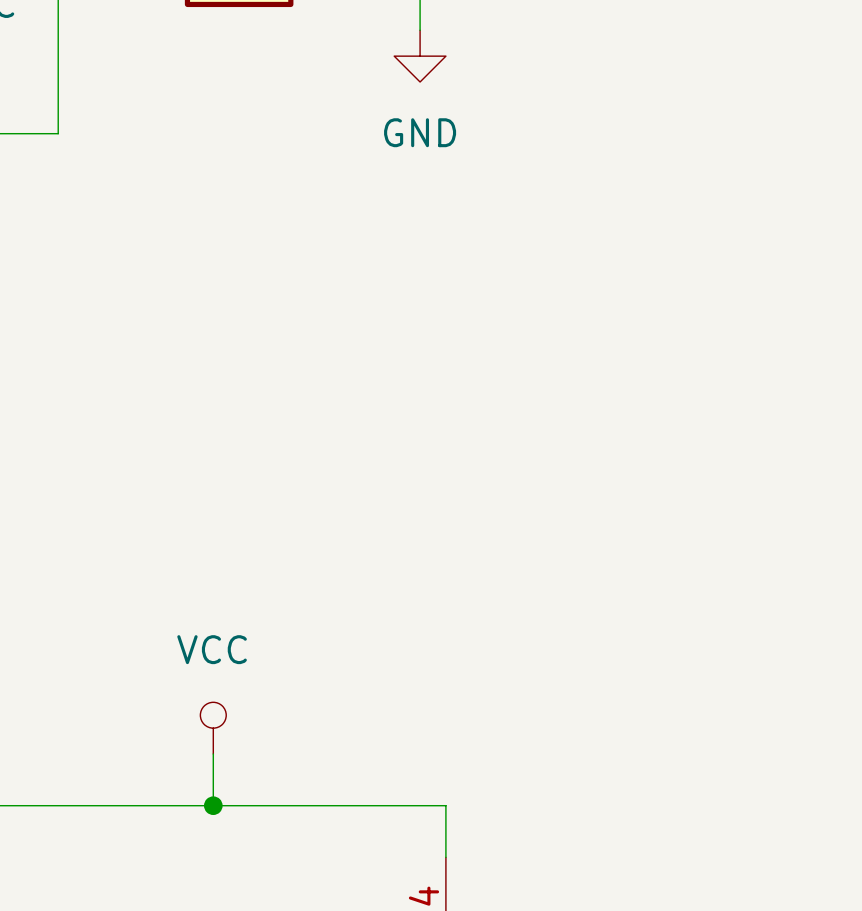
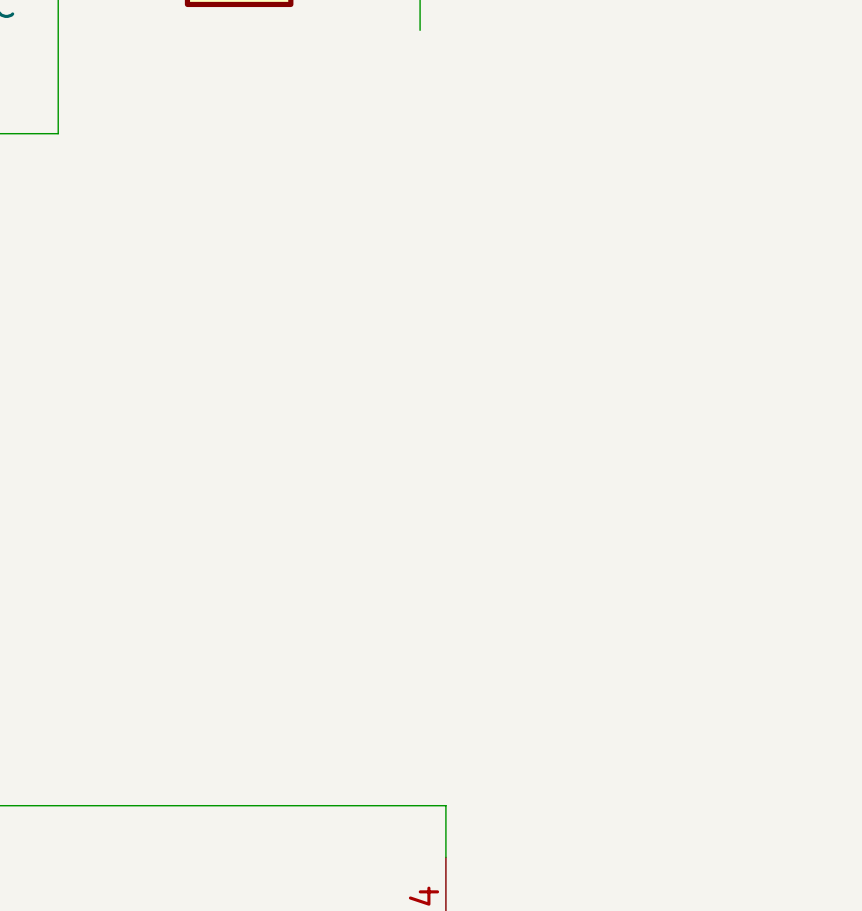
power symbol: GND (420, 56) -> none
power symbol: VCC (213, 728) -> none
wire: (213, 754) (213, 805) -> none
junction: (213, 805) -> none

